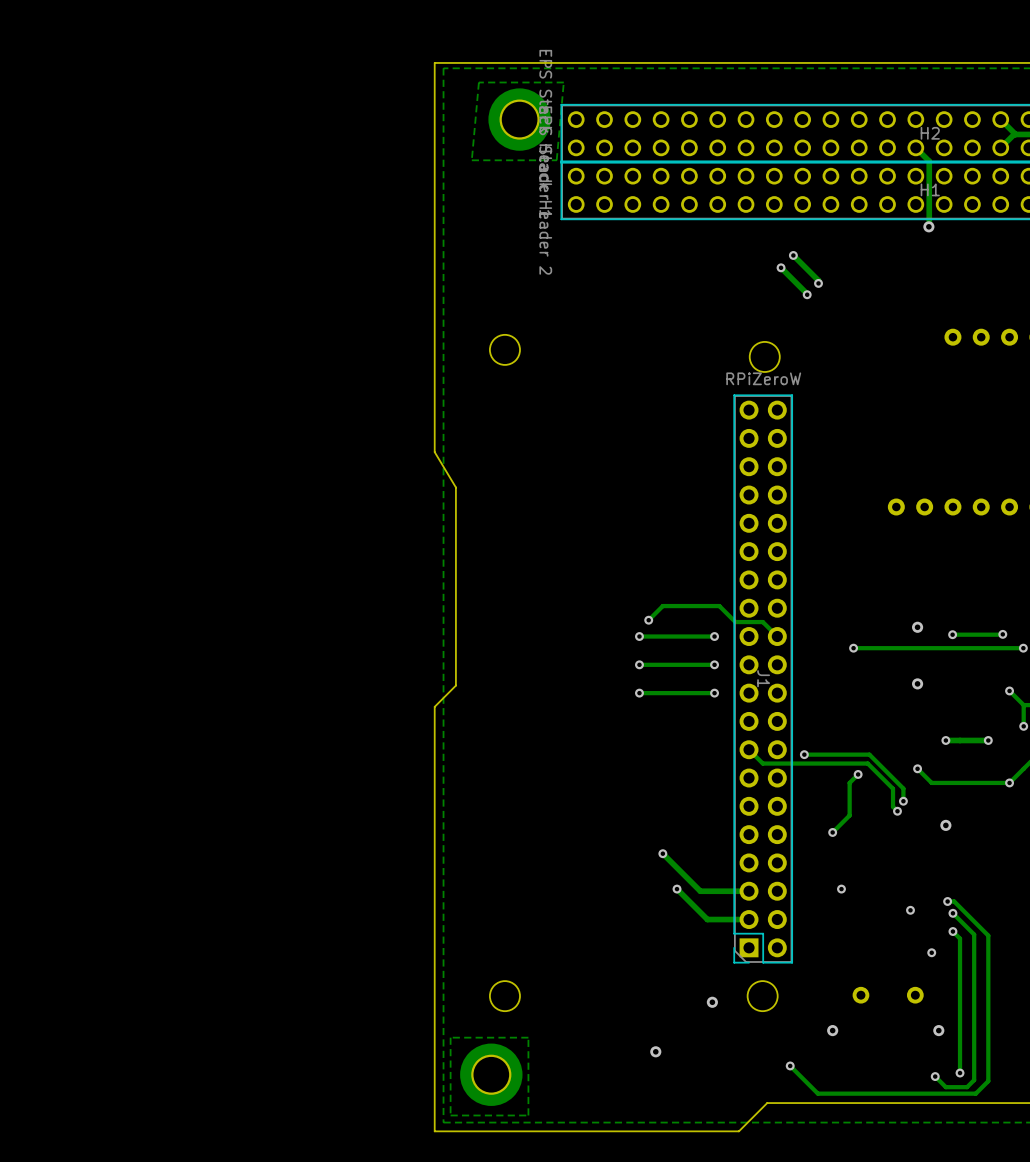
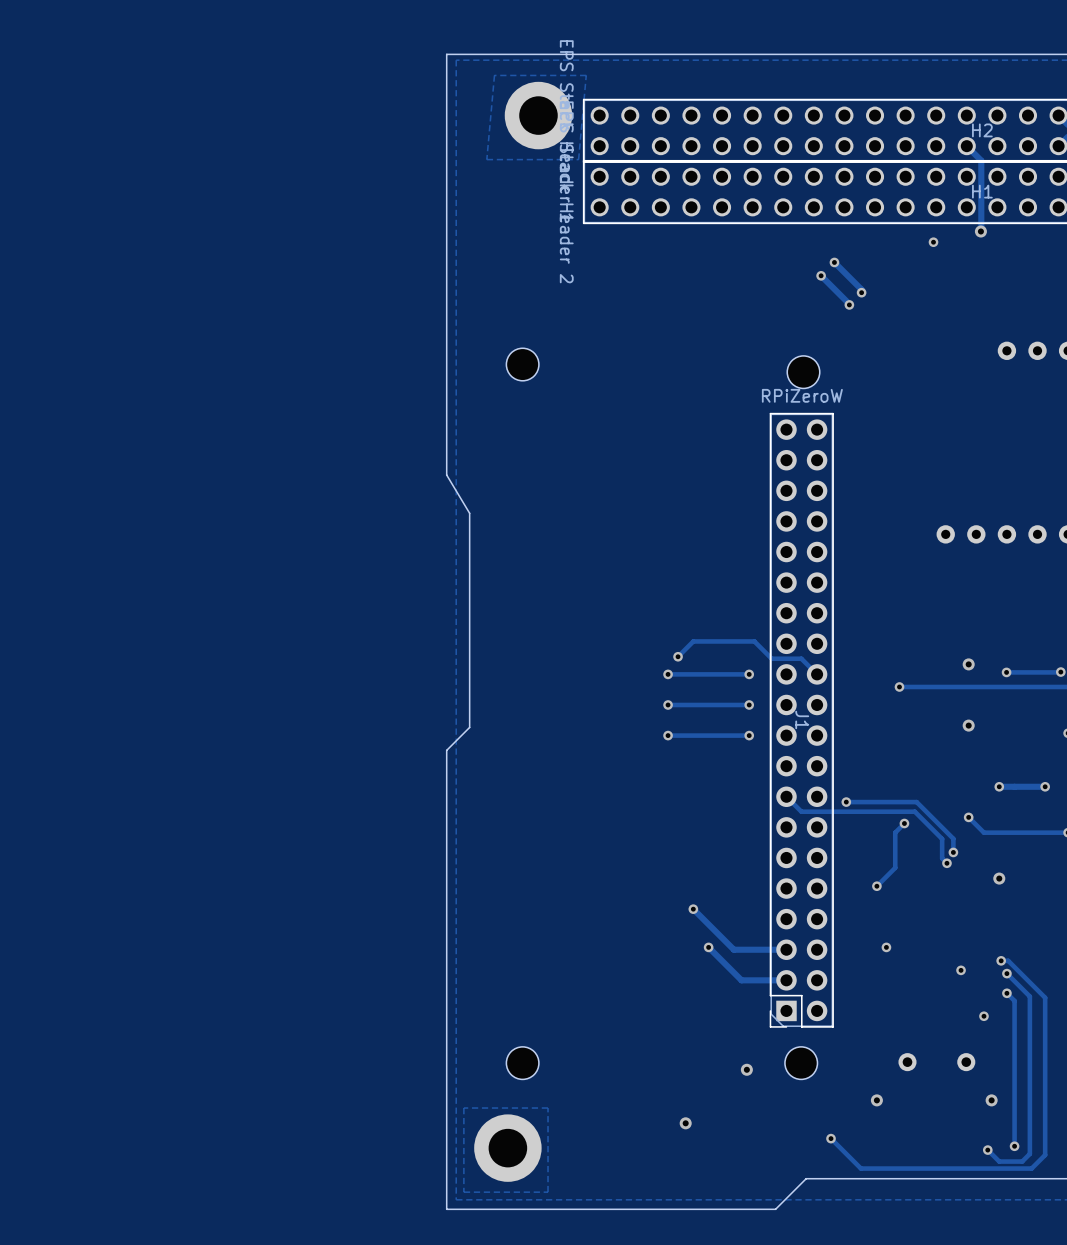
via: none -> (933, 242)

